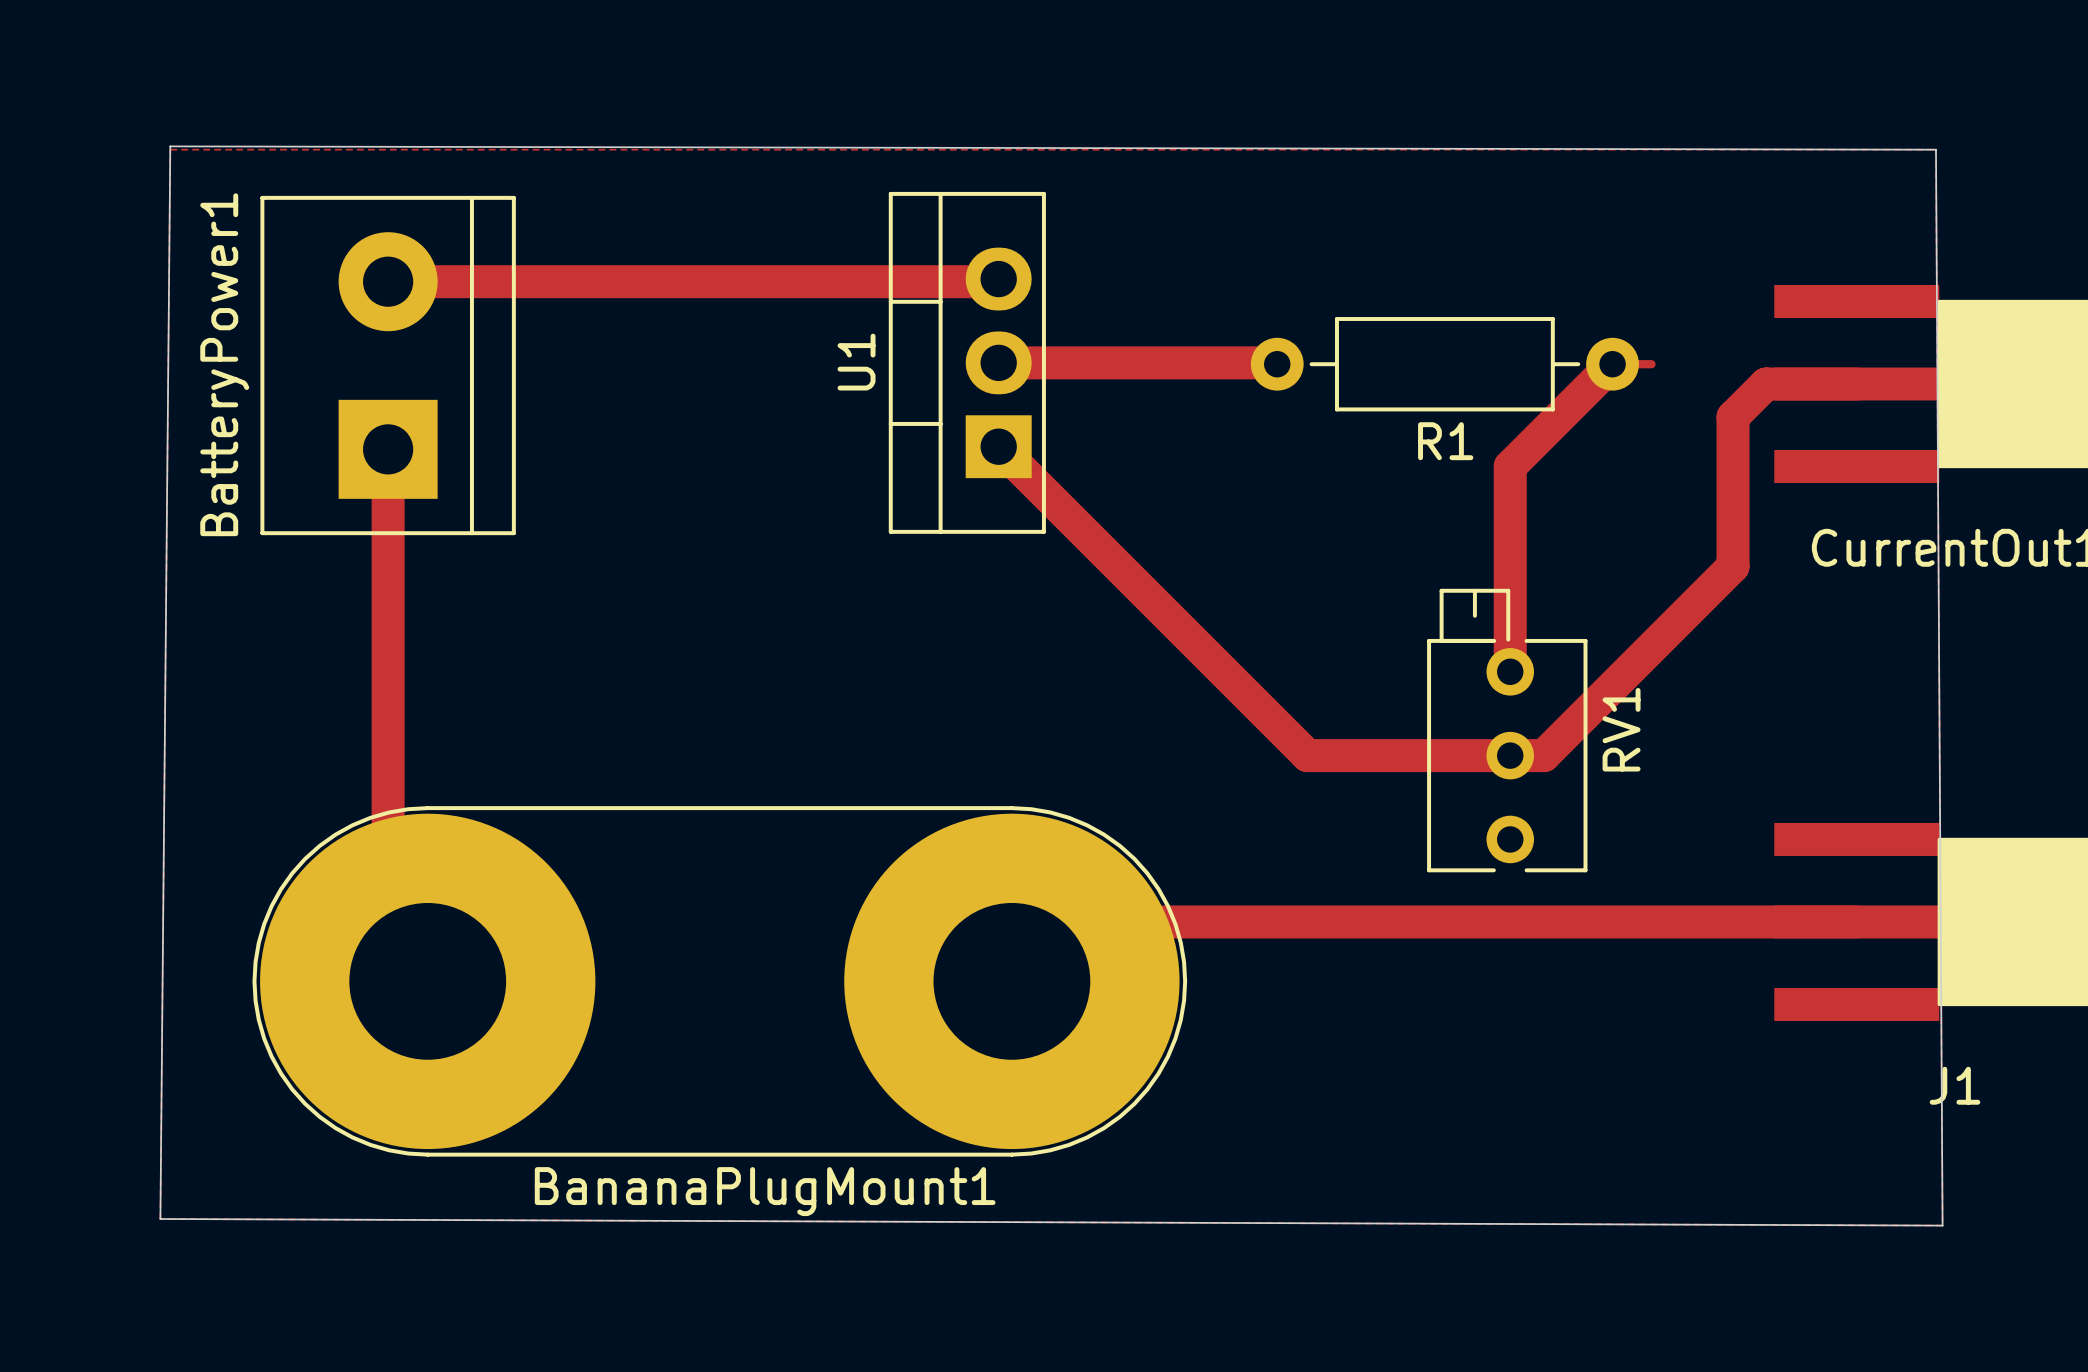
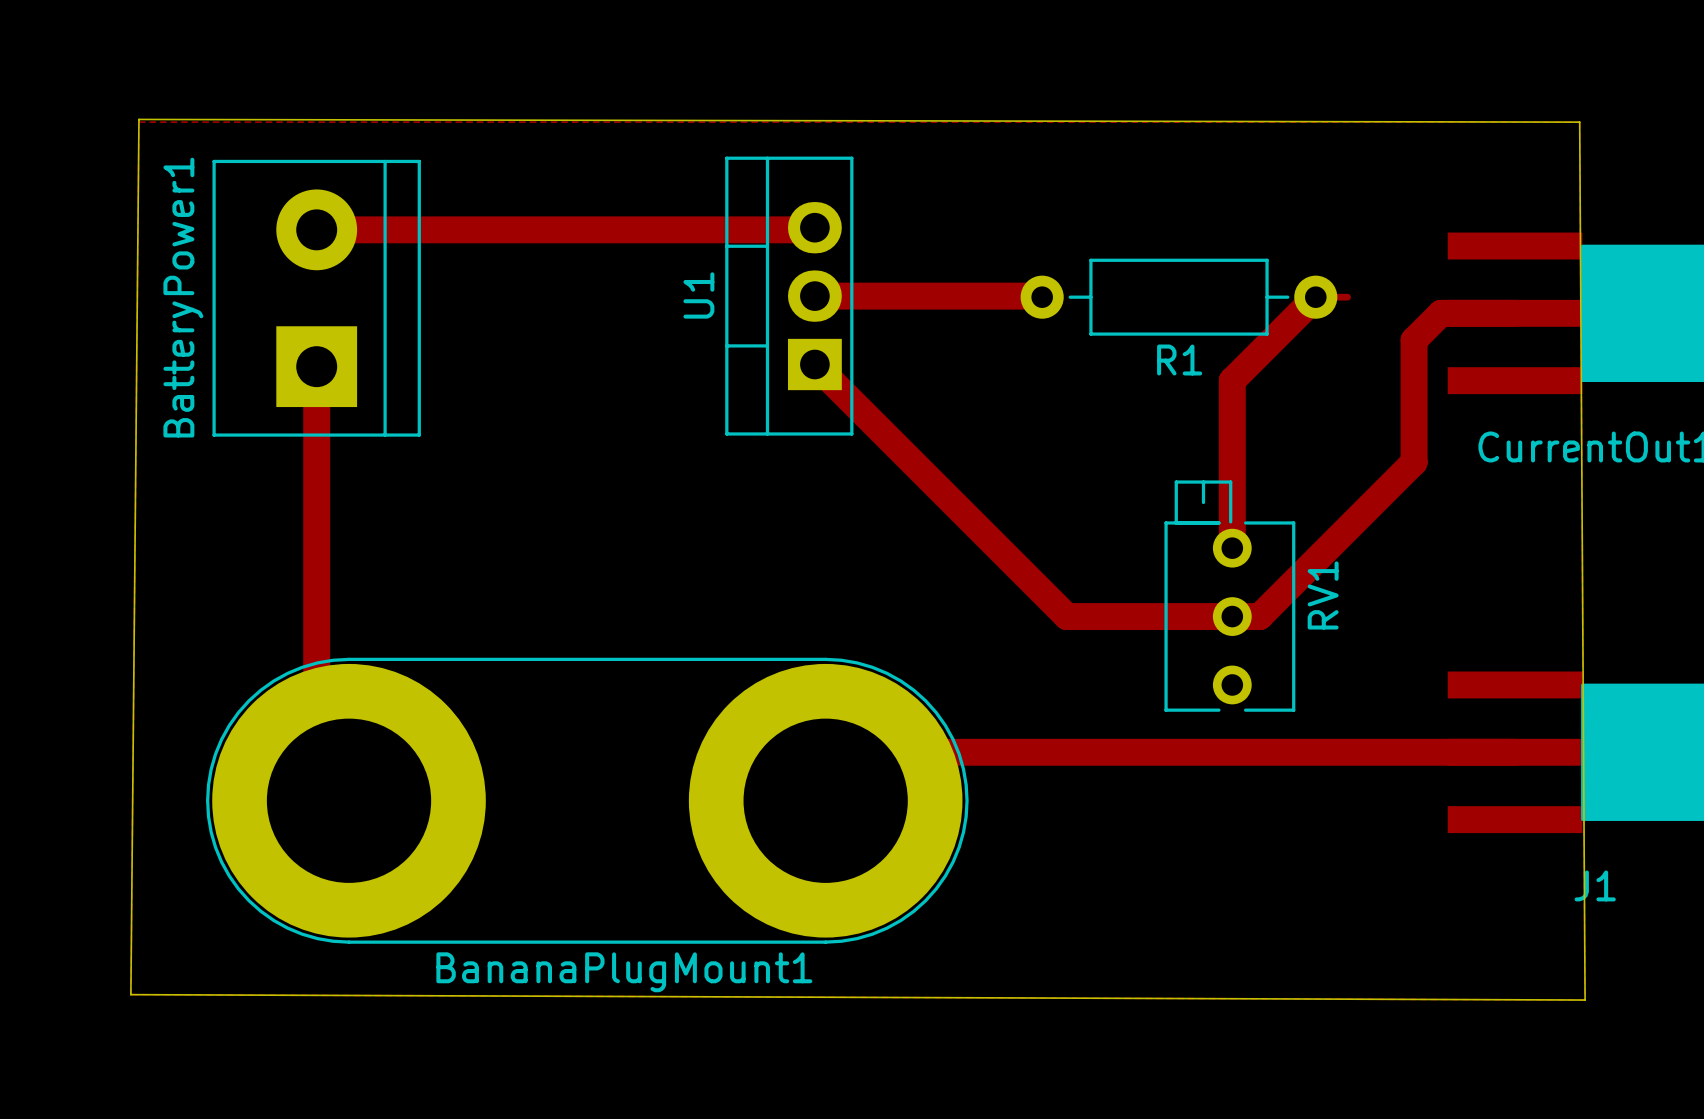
BananaPlugMount1 footprint: [252, 806, 1188, 1157] -> [206, 657, 969, 944]

